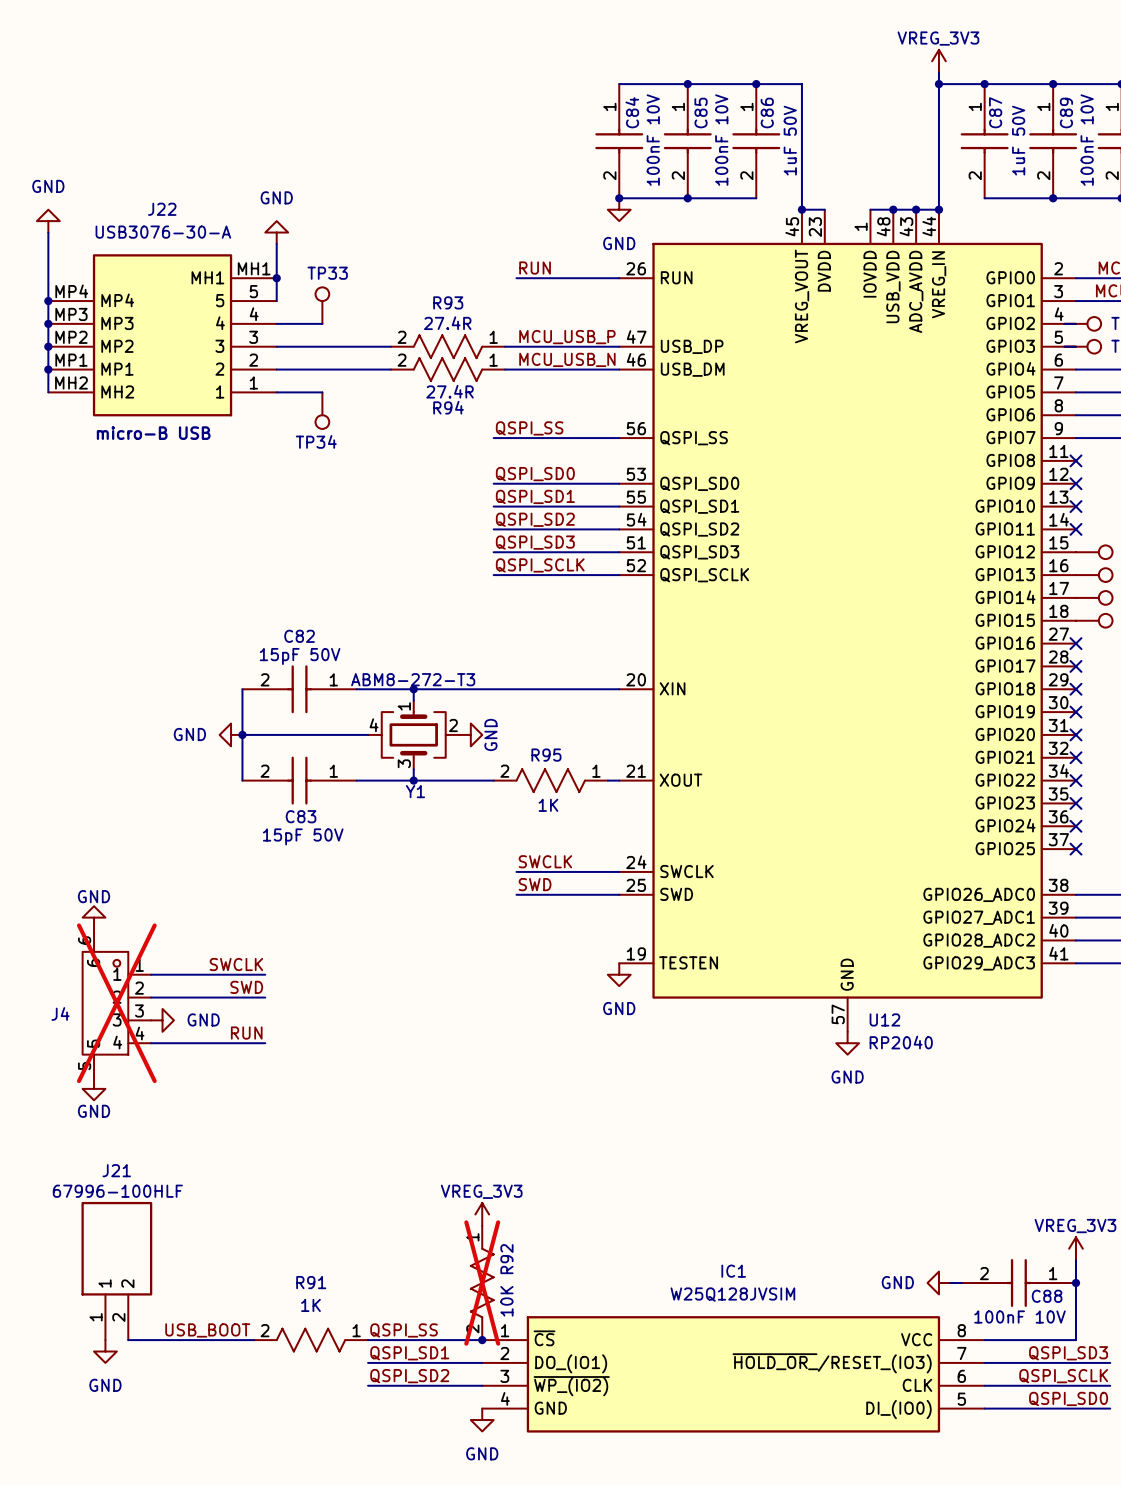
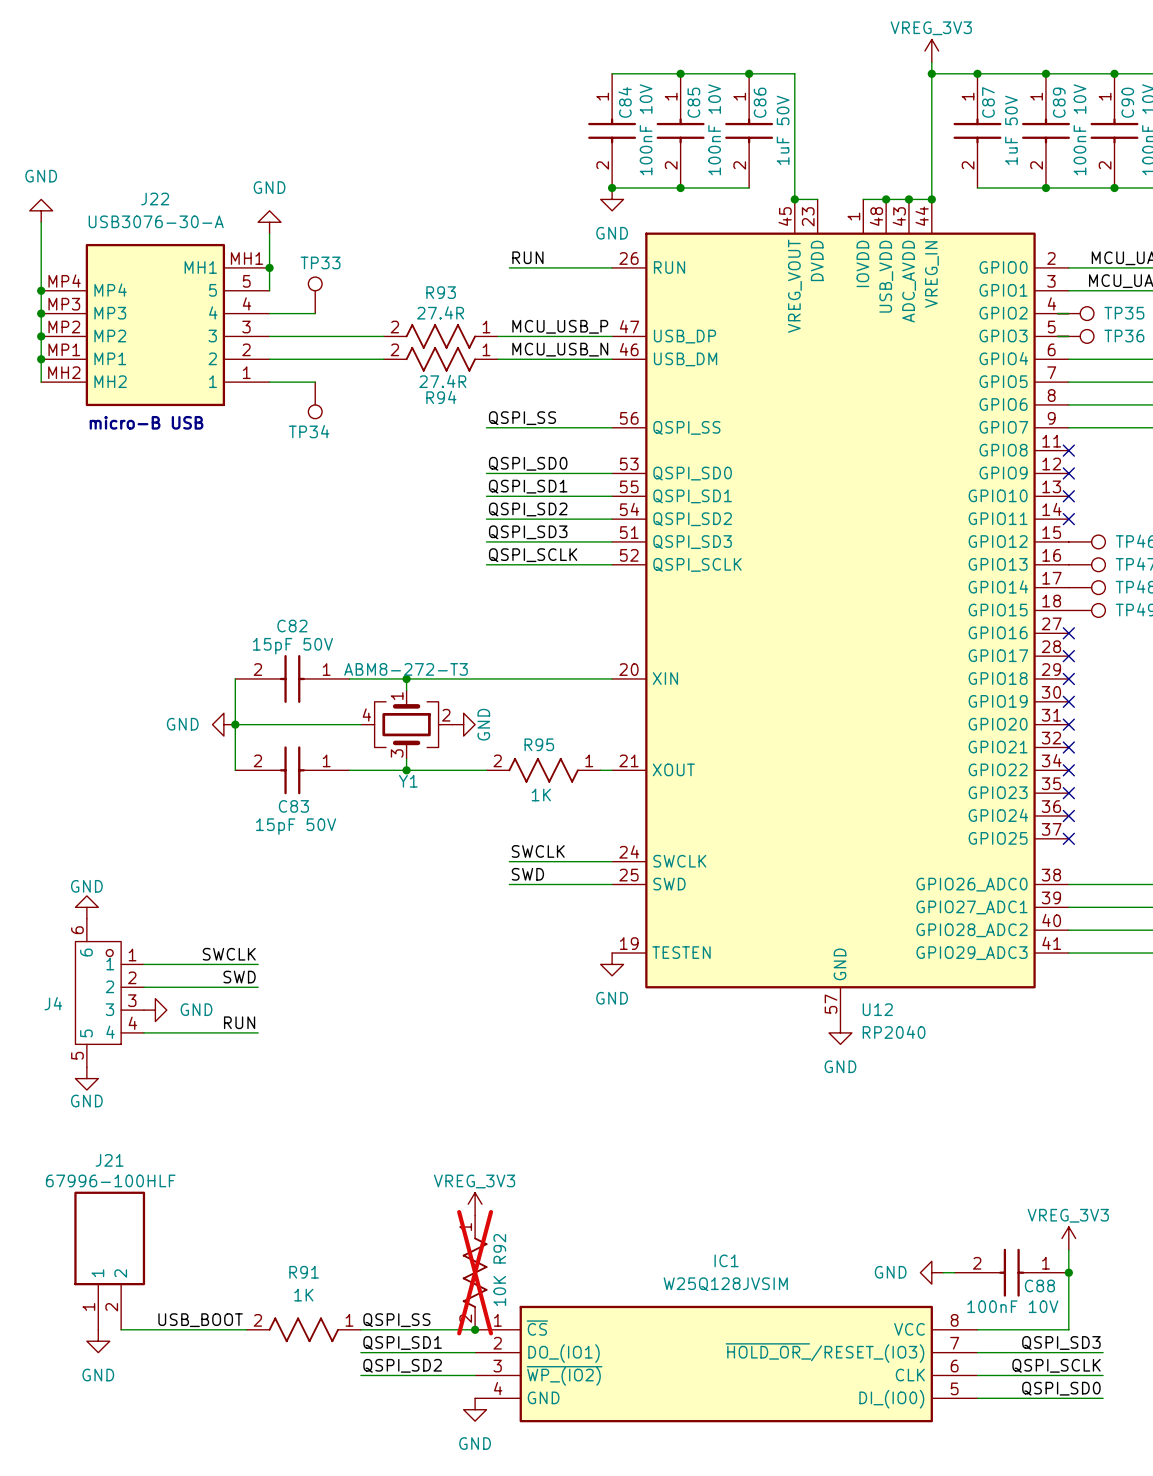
J4 do-not-place cross: (116, 1003) -> none

